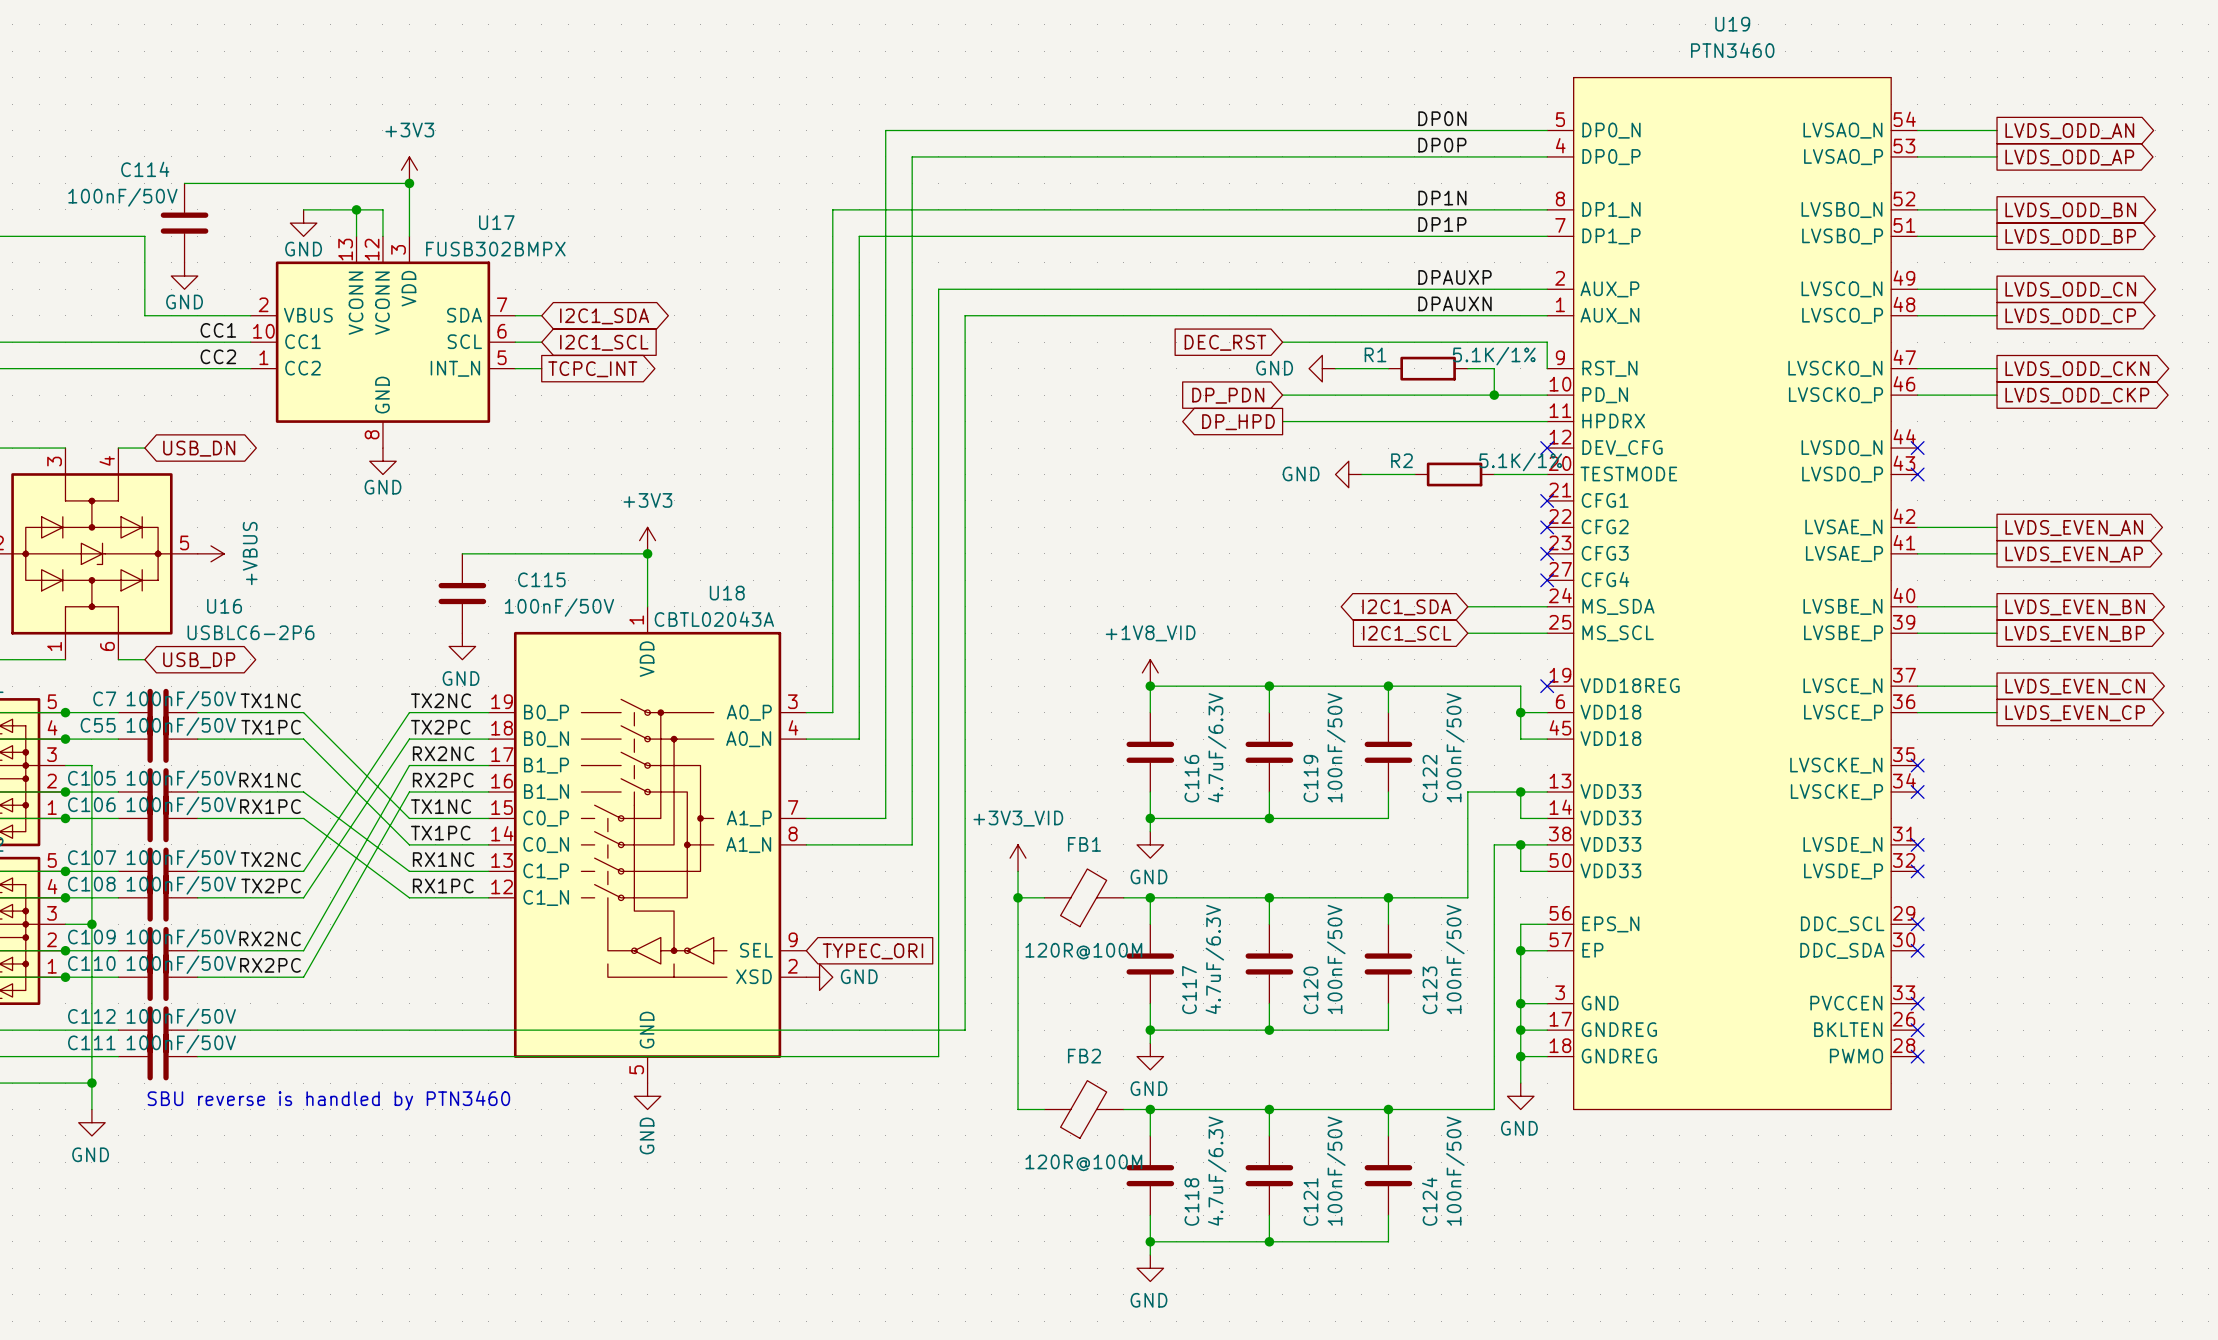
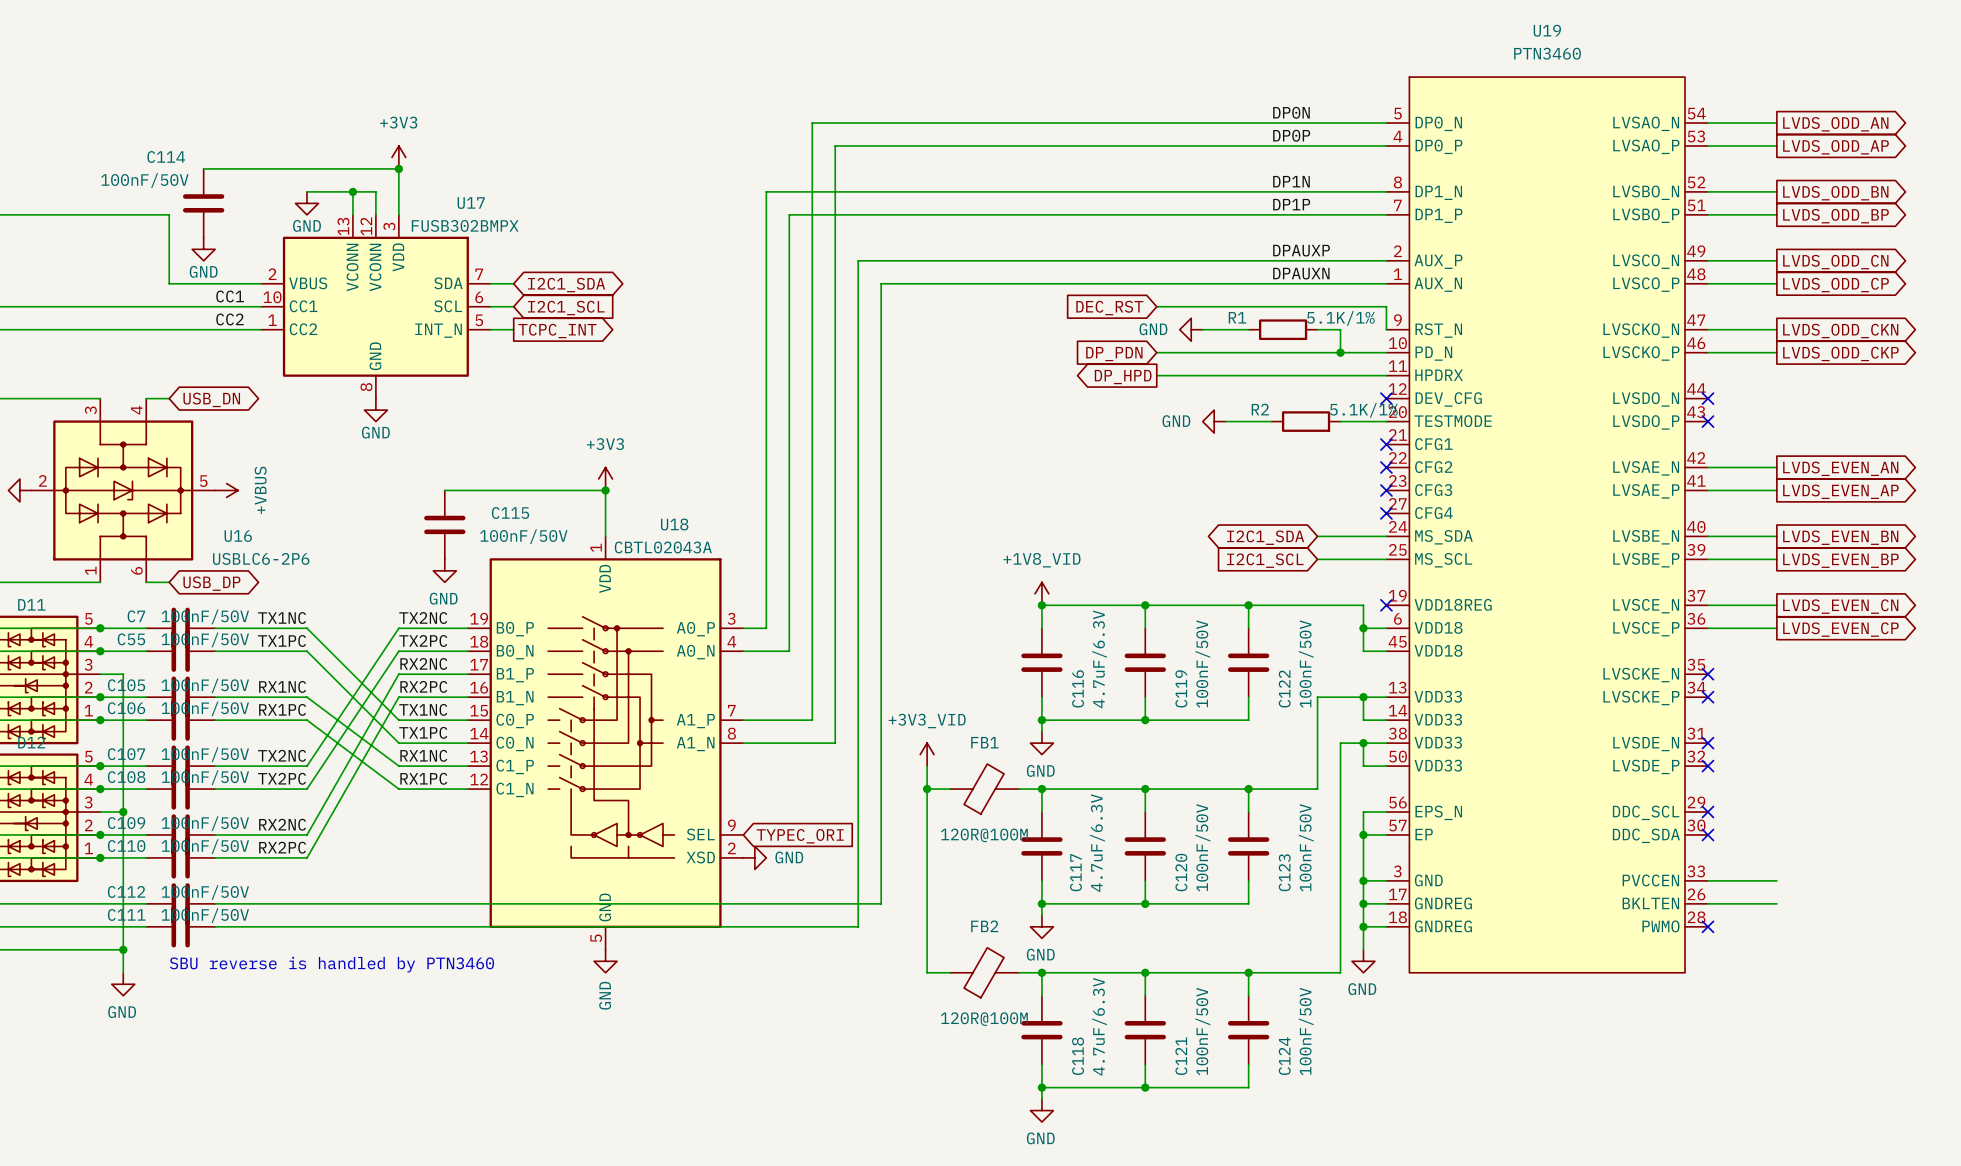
wire: none -> (1707, 880) (1776, 880)
no-connect mark: (1917, 1003) -> none
wire: none -> (1707, 903) (1776, 903)
no-connect mark: (1917, 1030) -> none

